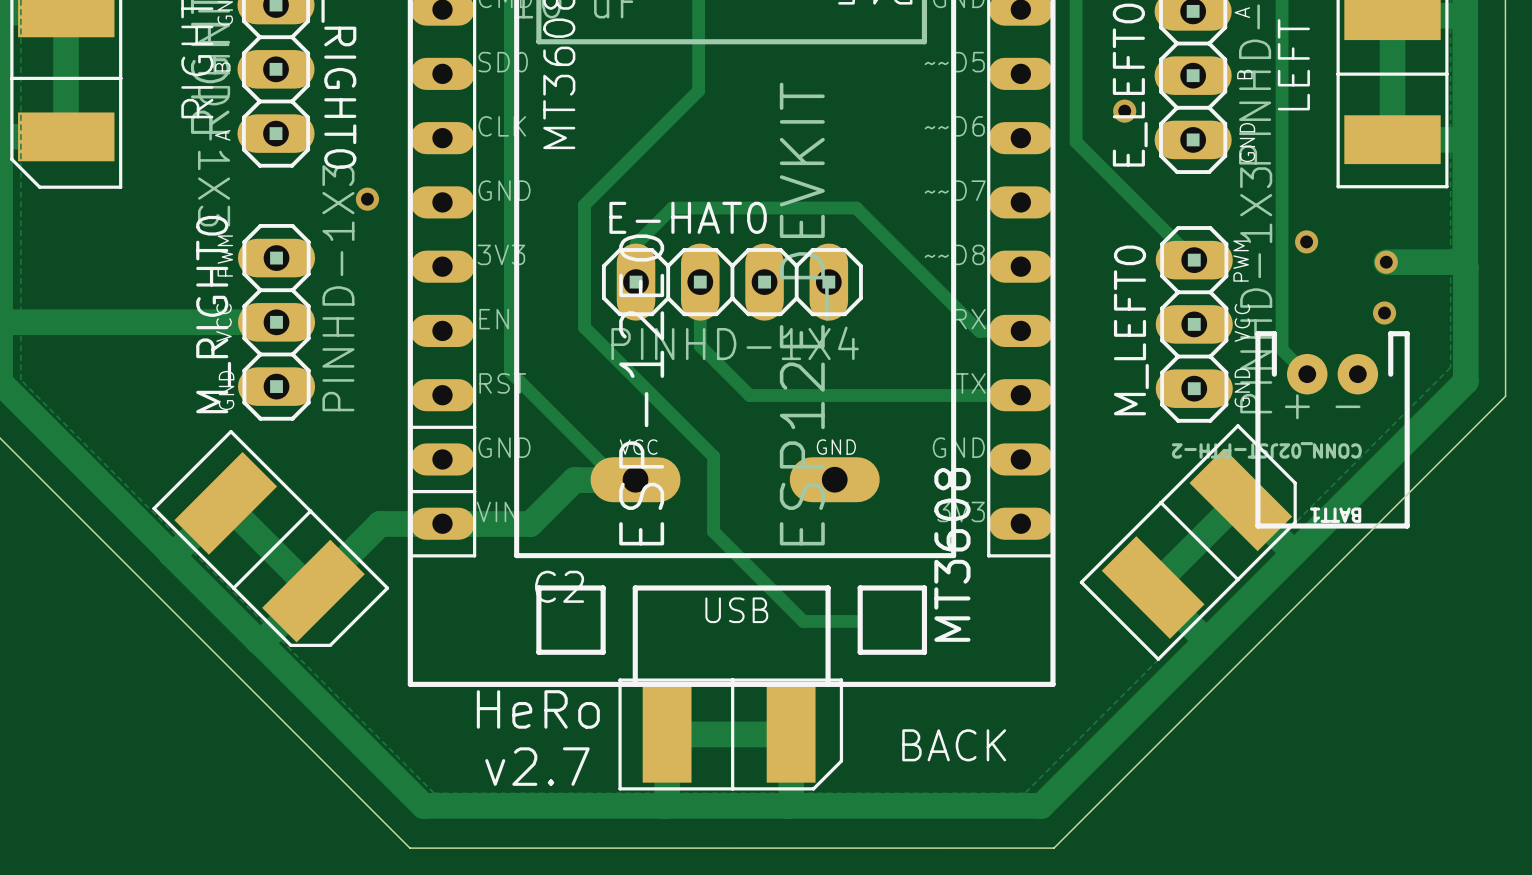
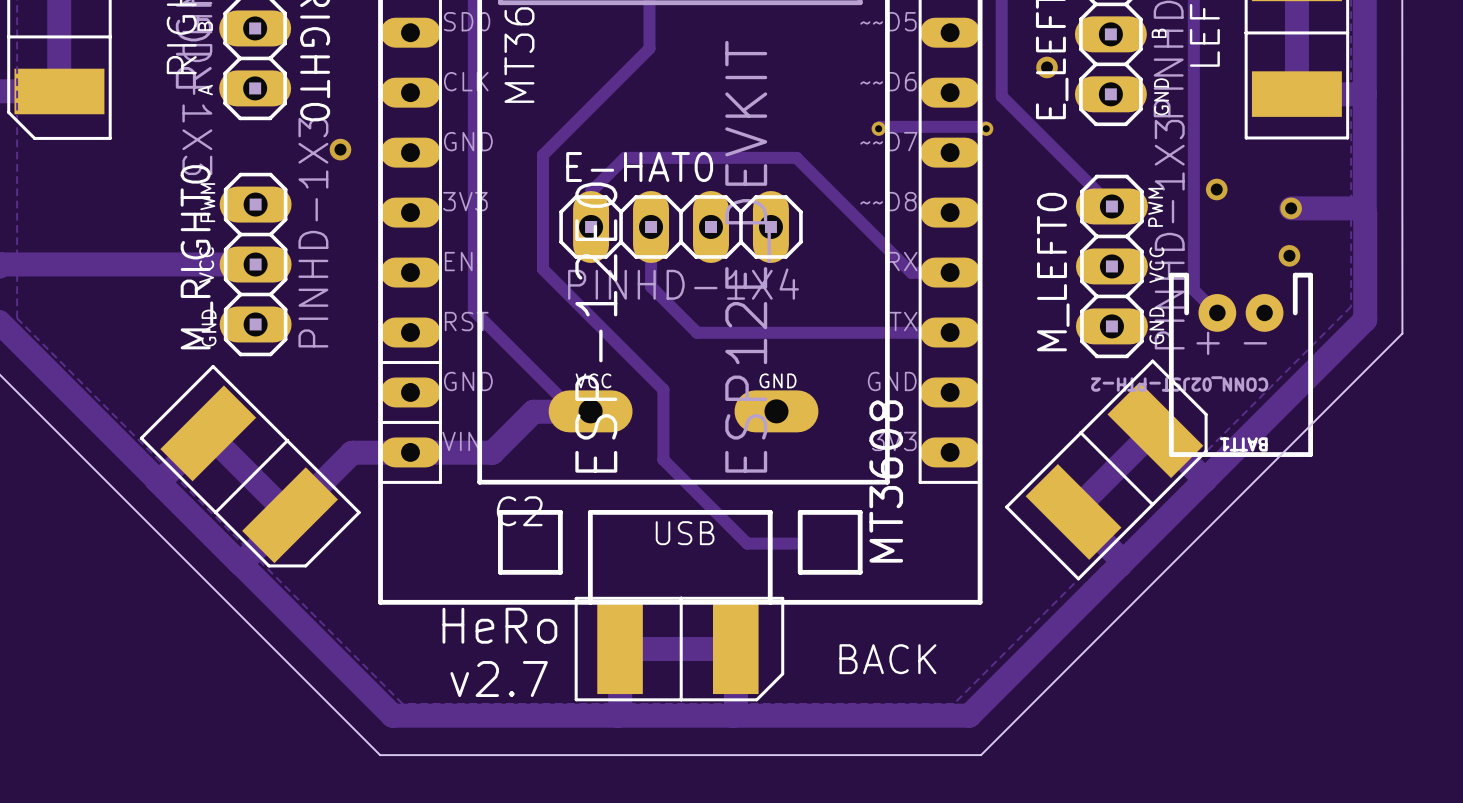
track: none -> (878, 128) (880, 126) (984, 126) (986, 128)
via: none -> (878, 128)
via: none -> (986, 128)

